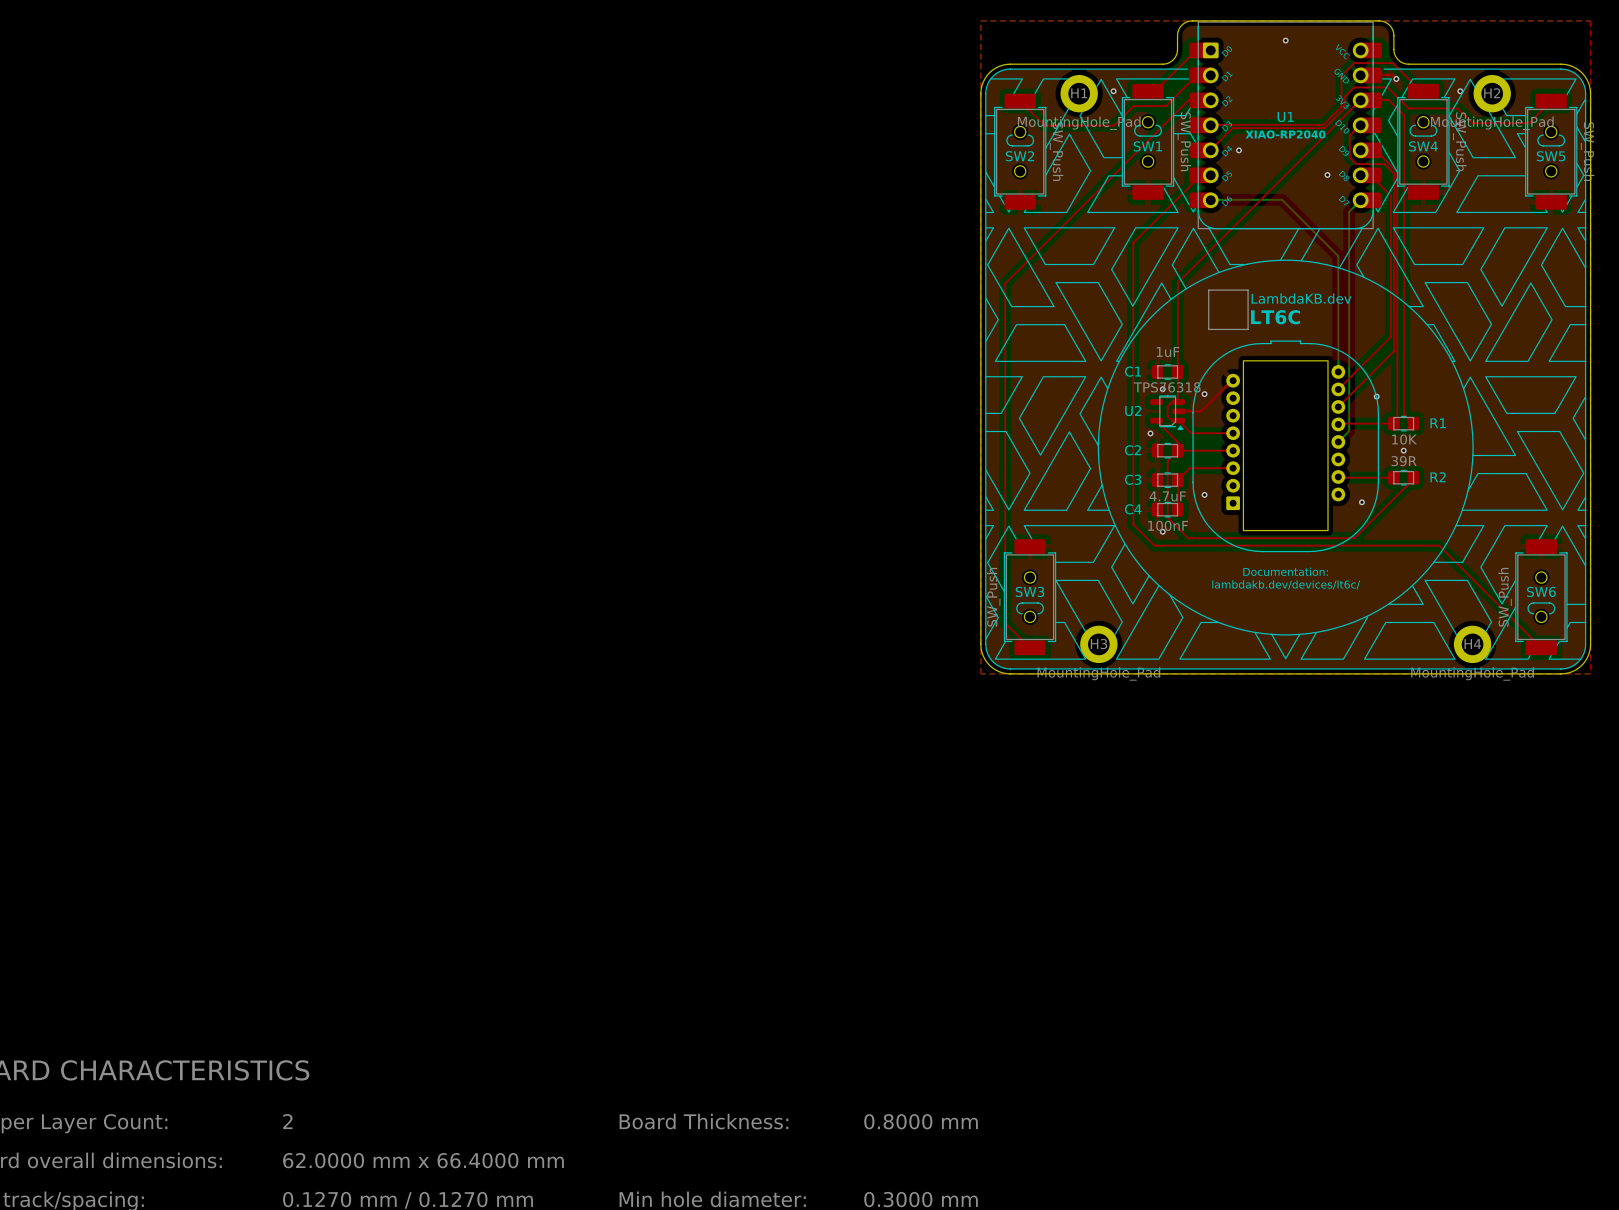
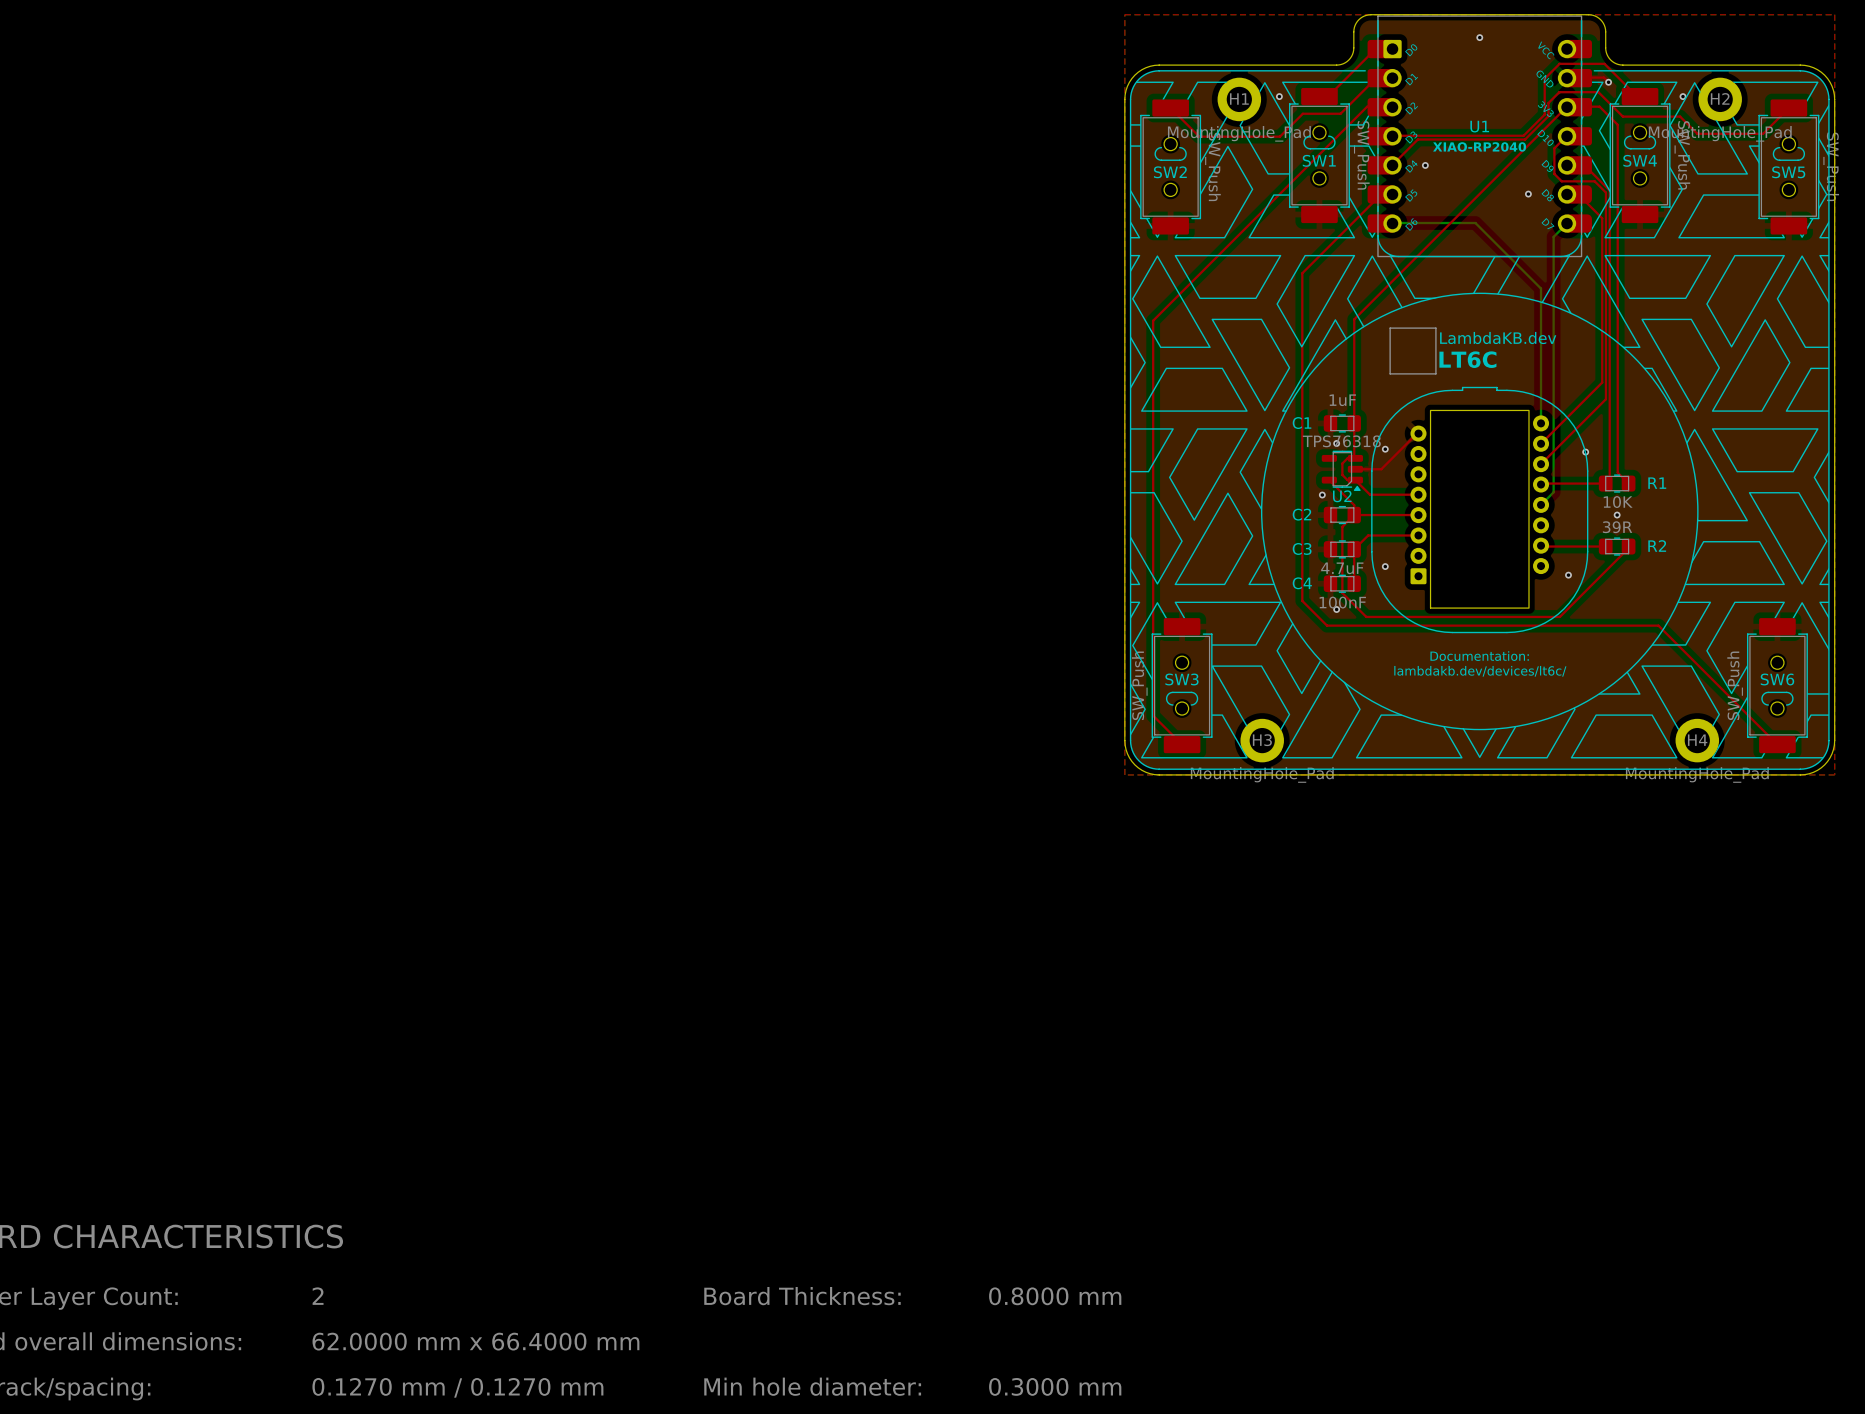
U2 name position: U2 (1133, 410) -> U2 (1342, 496)

